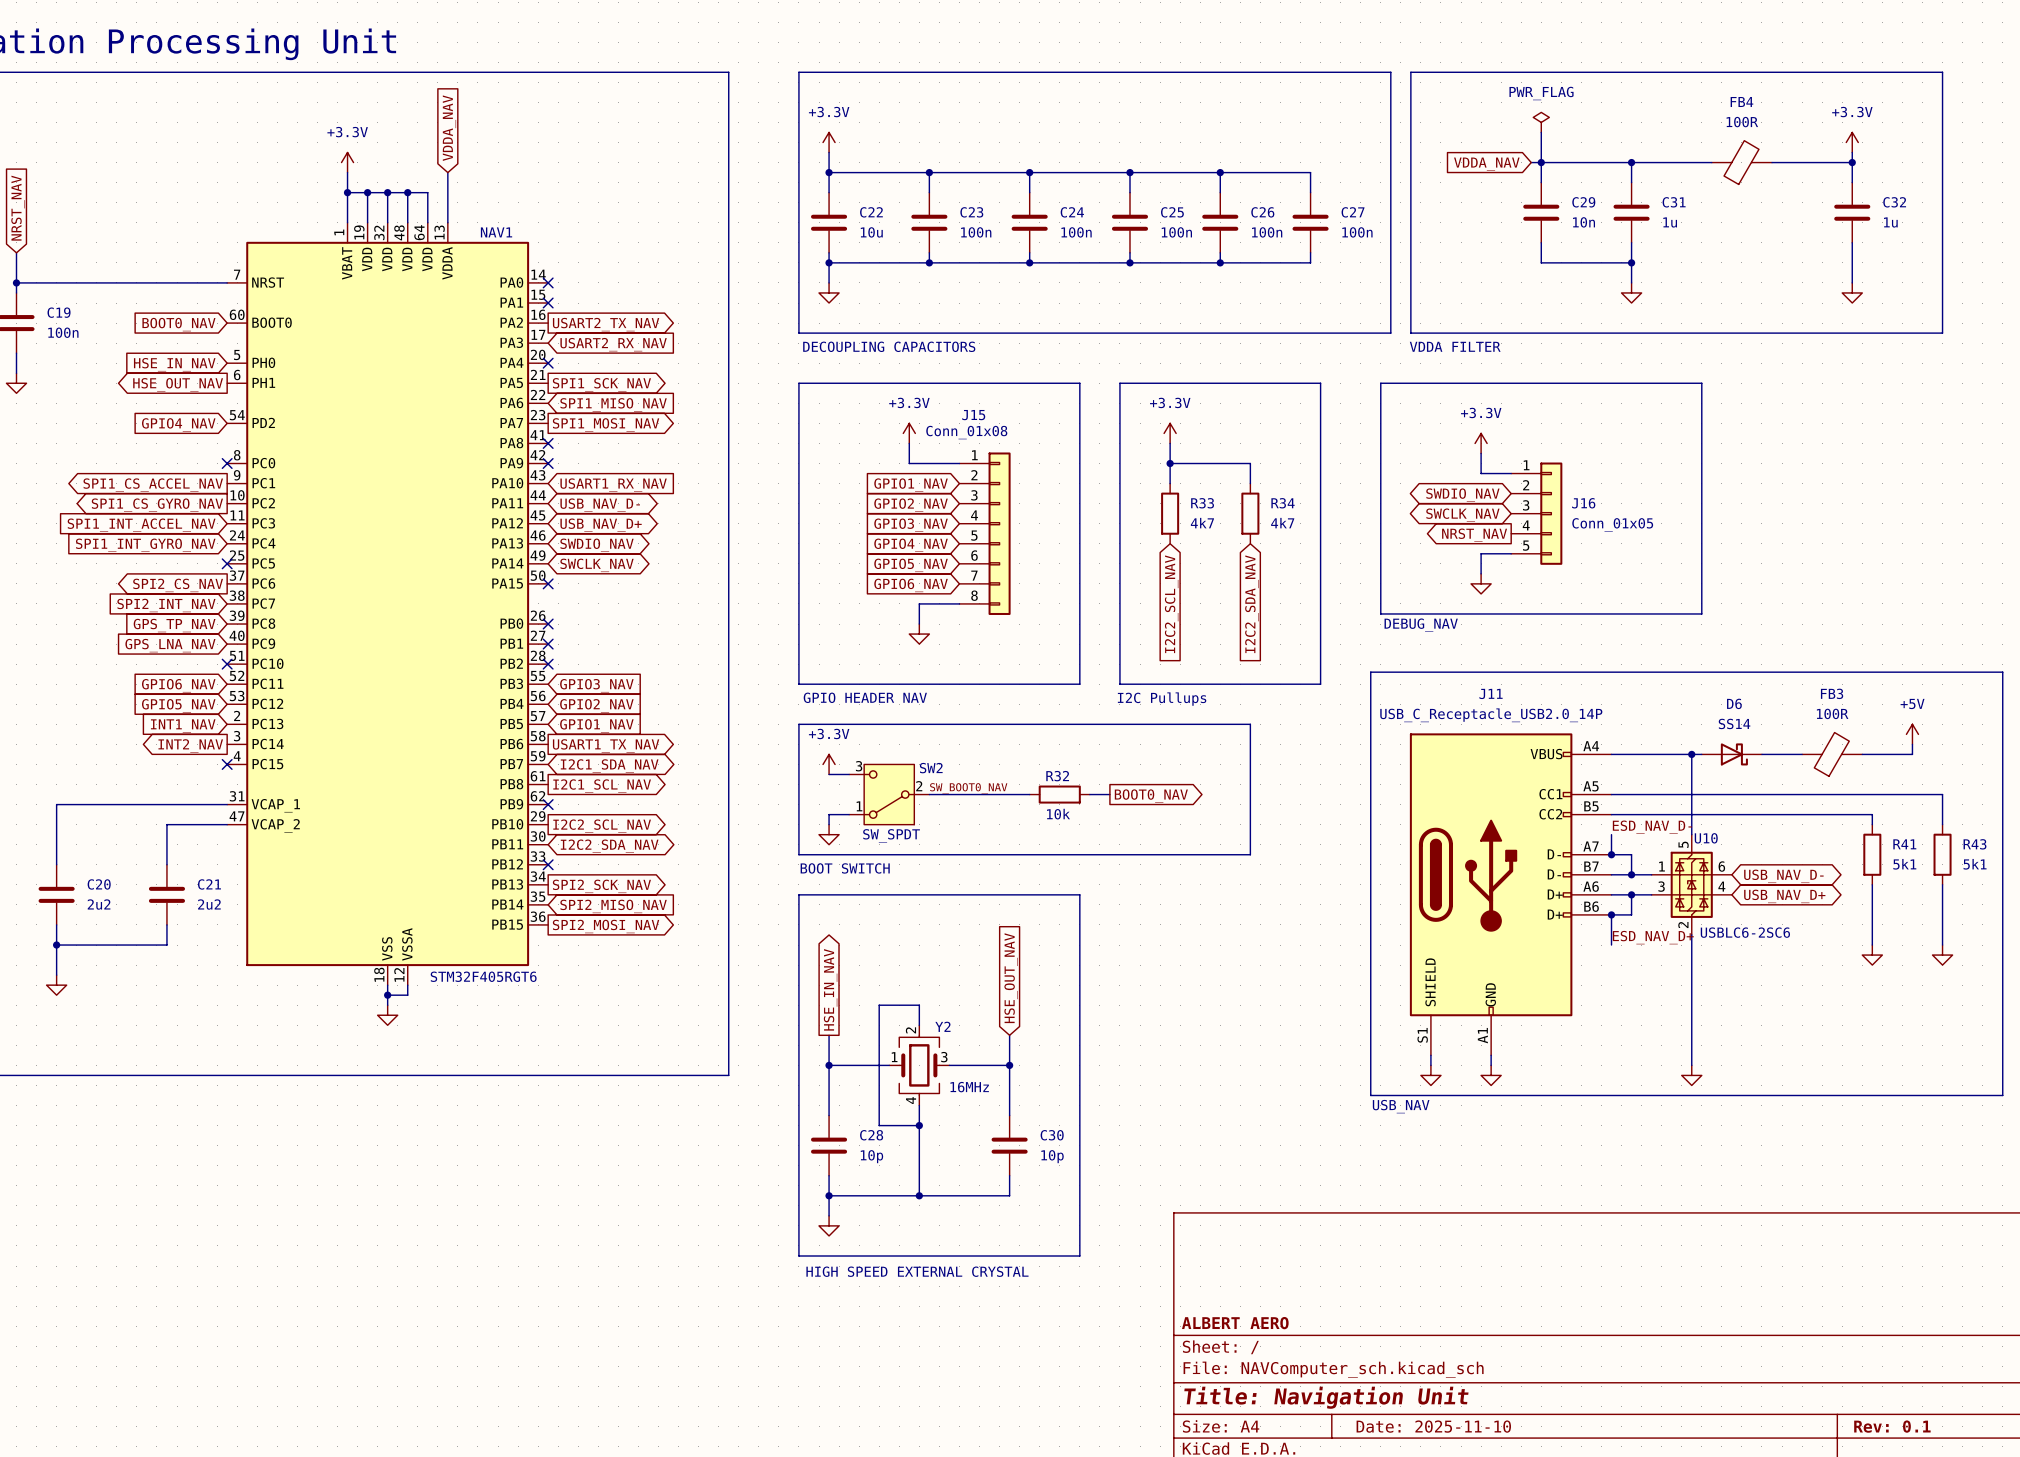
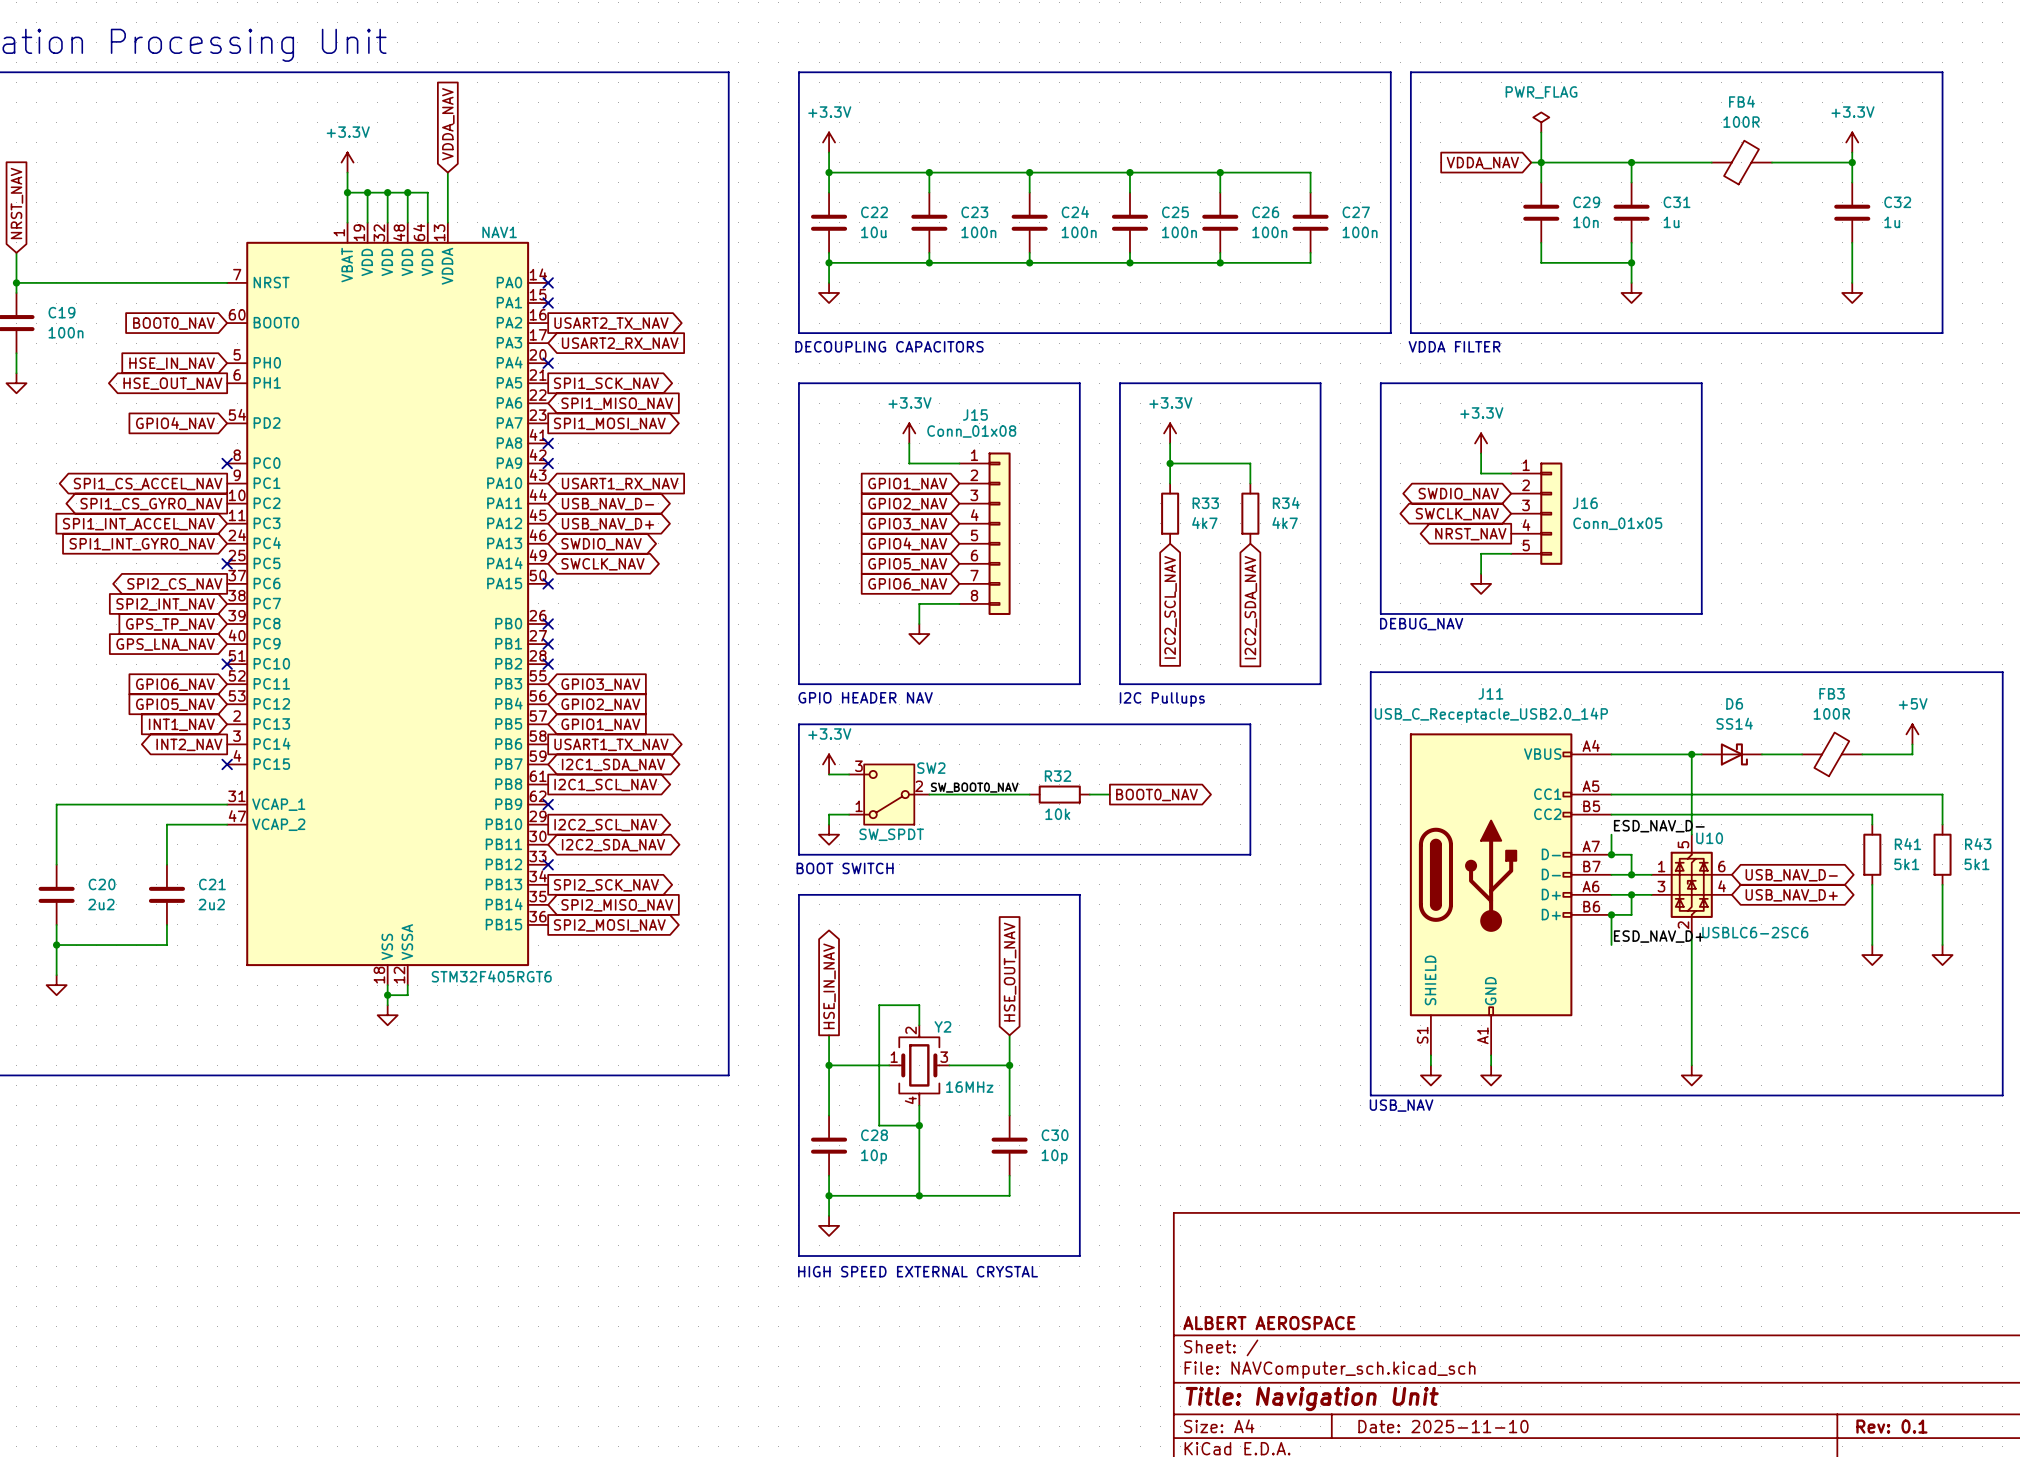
title block: ALBERT AERO (1235, 1323) -> ALBERT AEROSPACE (1269, 1323)

